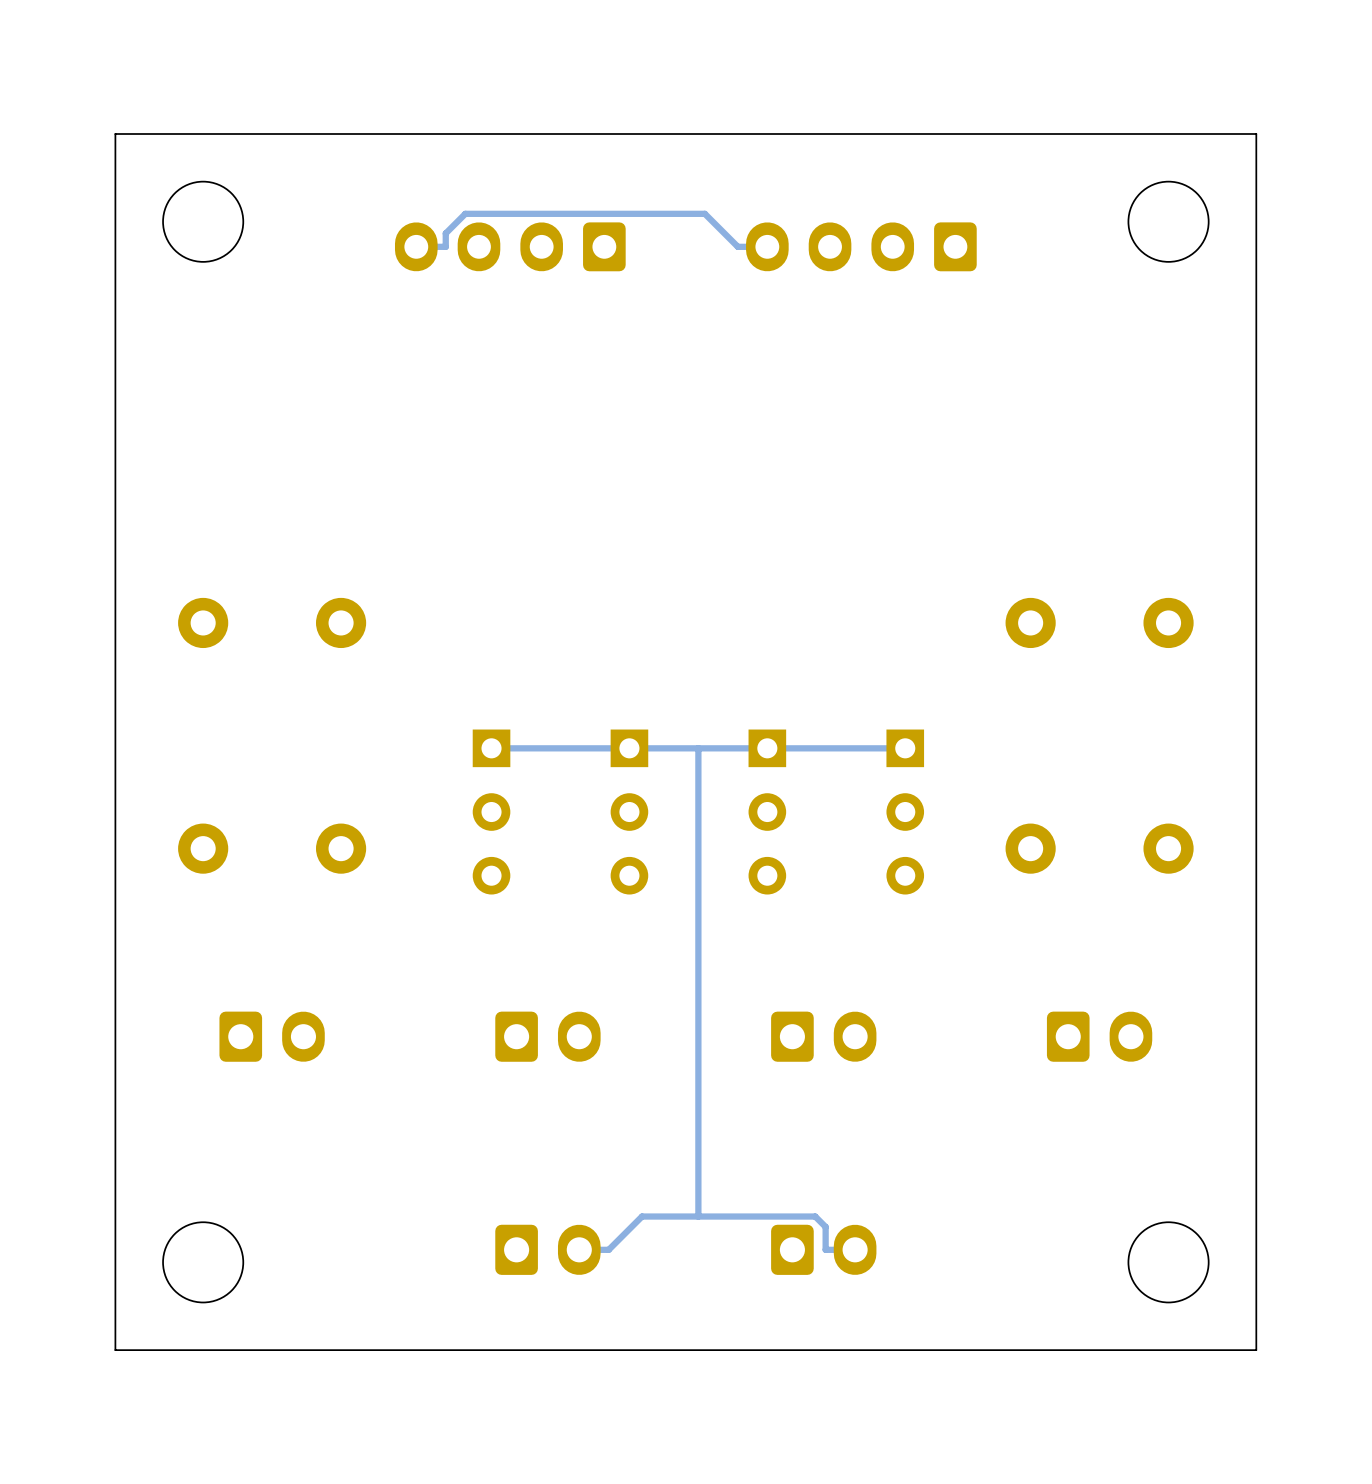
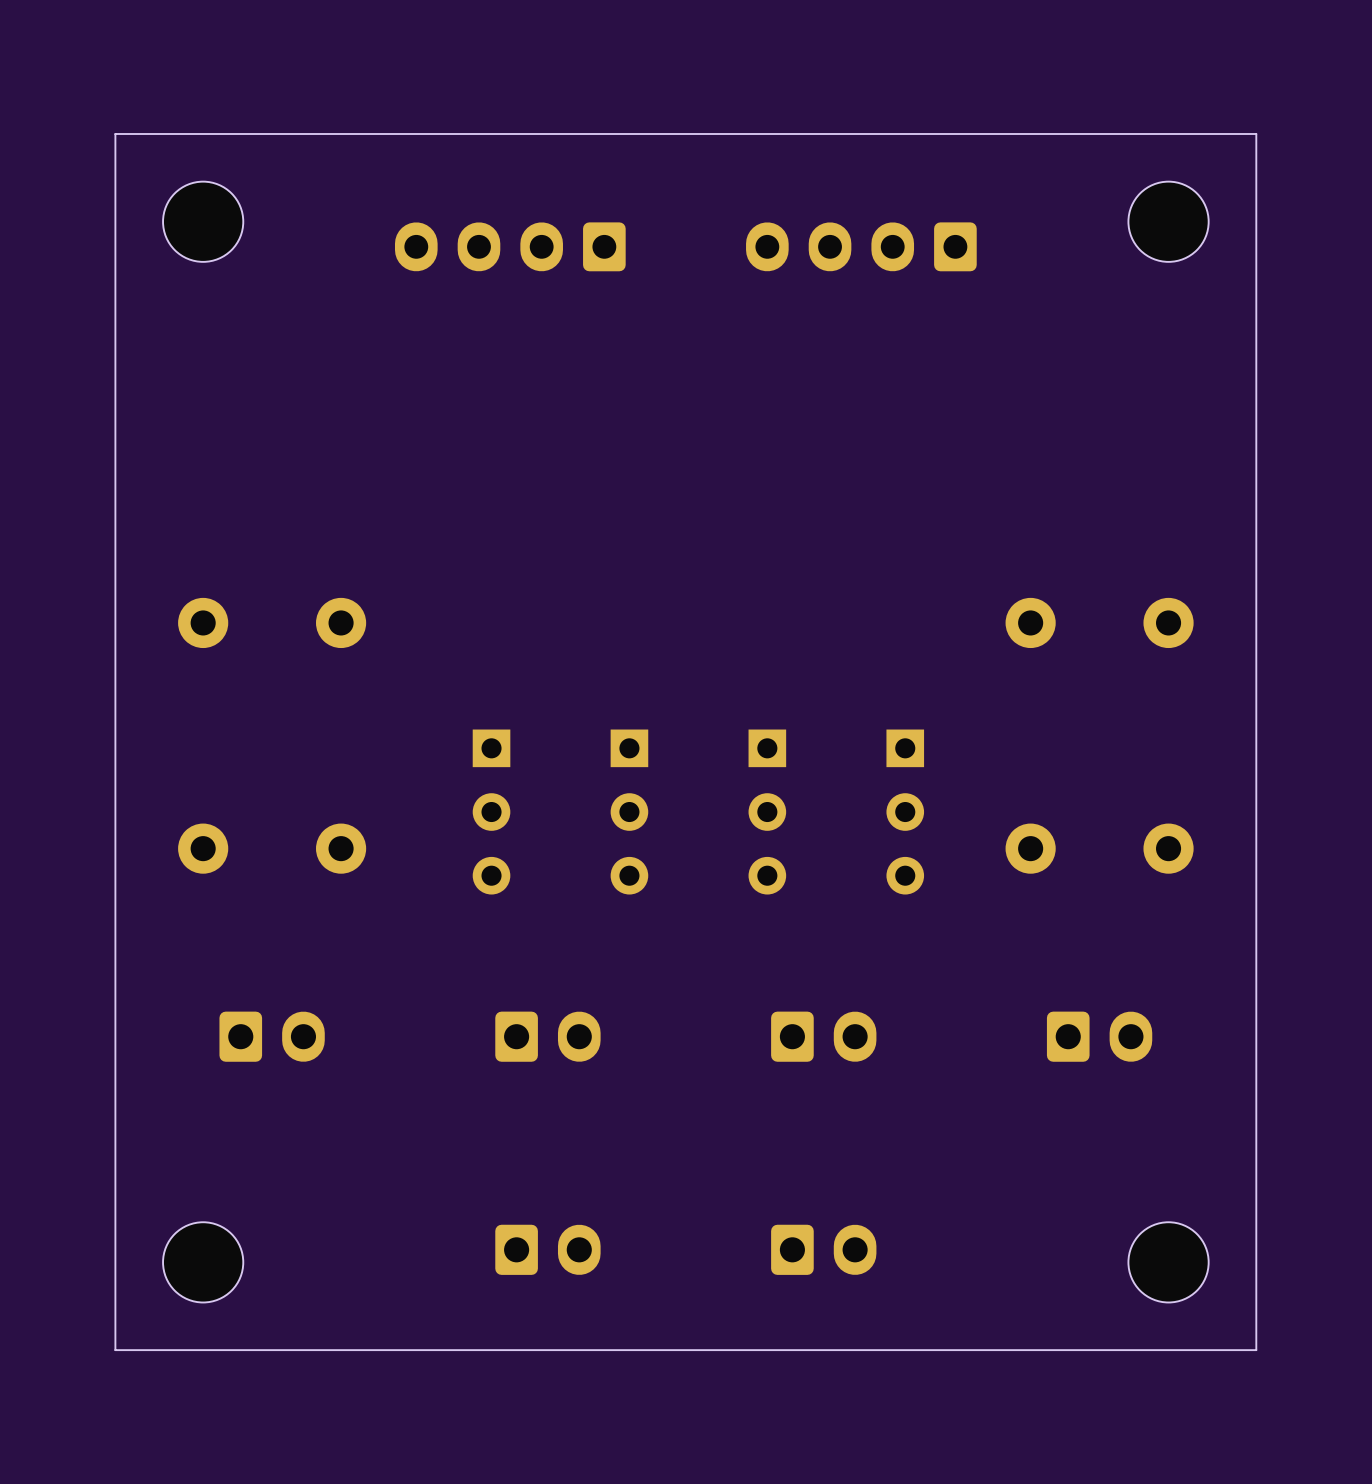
track: (767, 246) (737, 246) (704, 213) (465, 213) (445, 233) (445, 246) (416, 246) -> none
track: (698, 748) (698, 1216) -> none
track: (905, 748) (491, 748) -> none
track: (855, 1249) (825, 1249) (825, 1226) (815, 1216) (642, 1216) (608, 1249) (579, 1249) -> none

